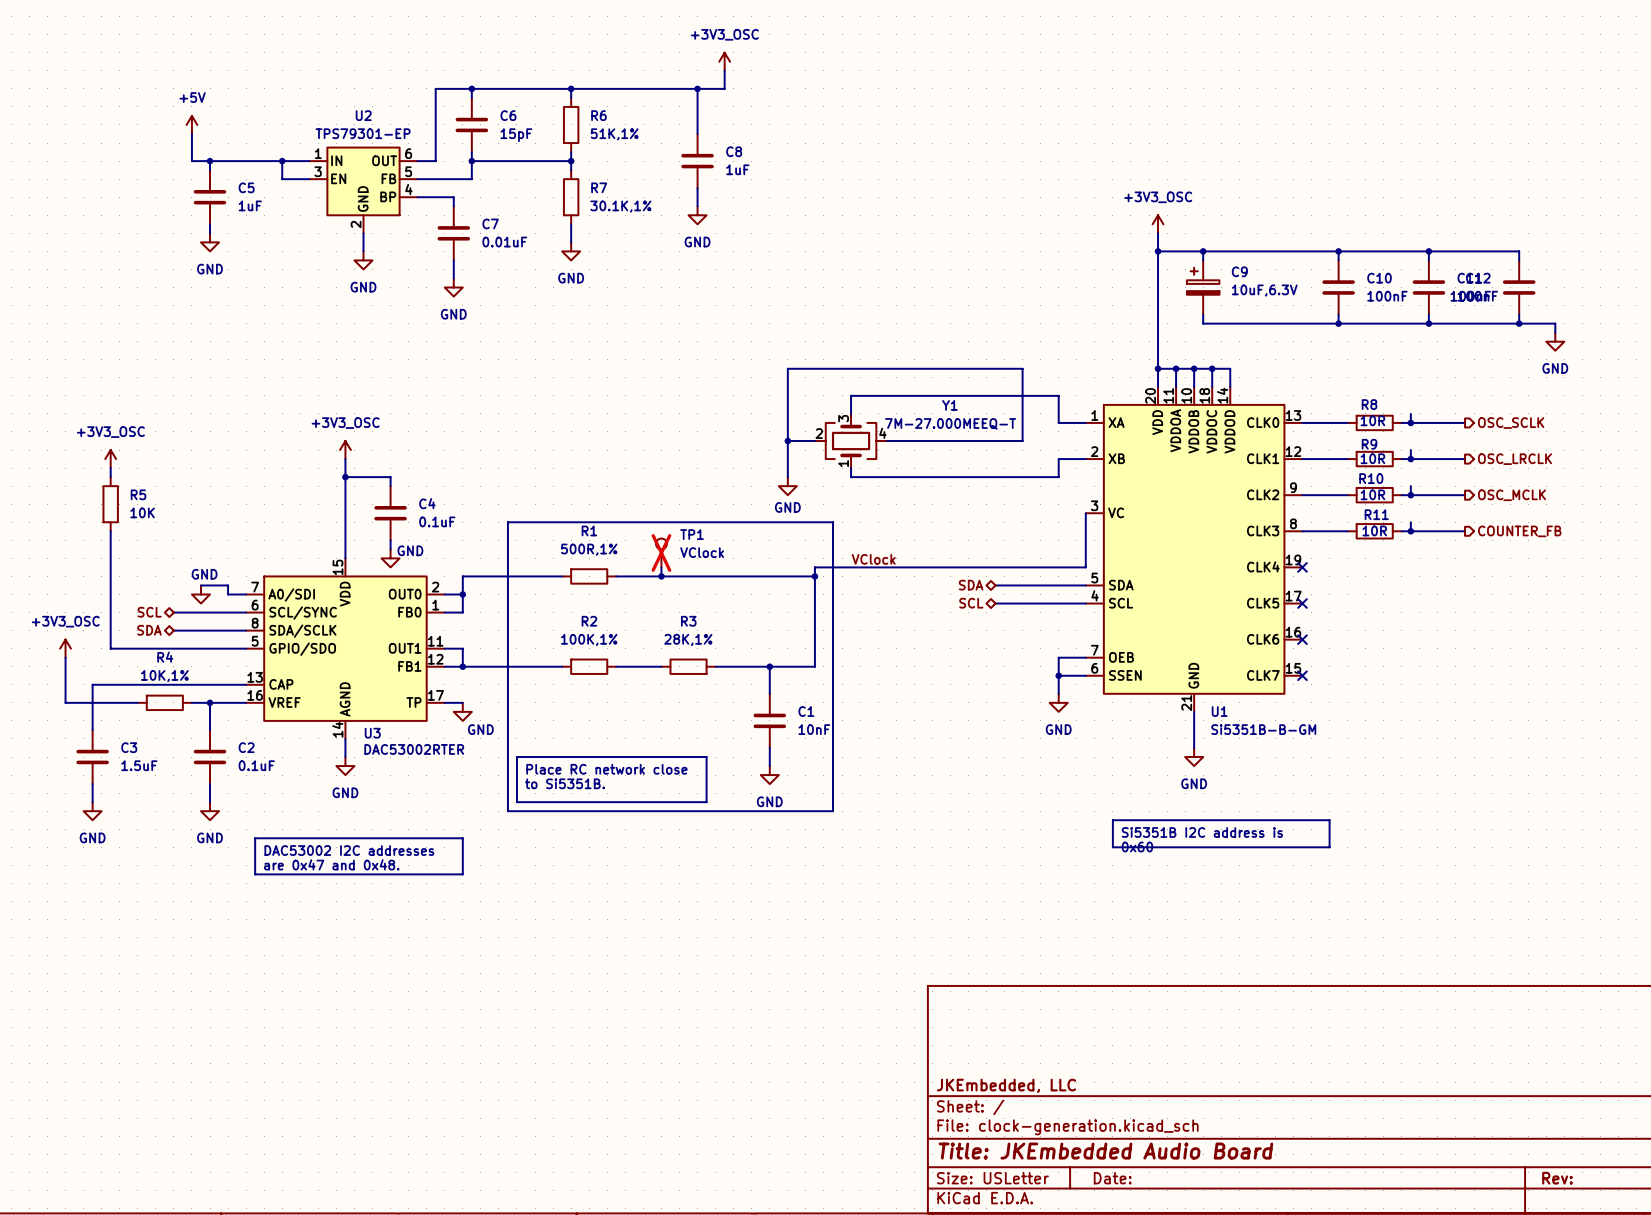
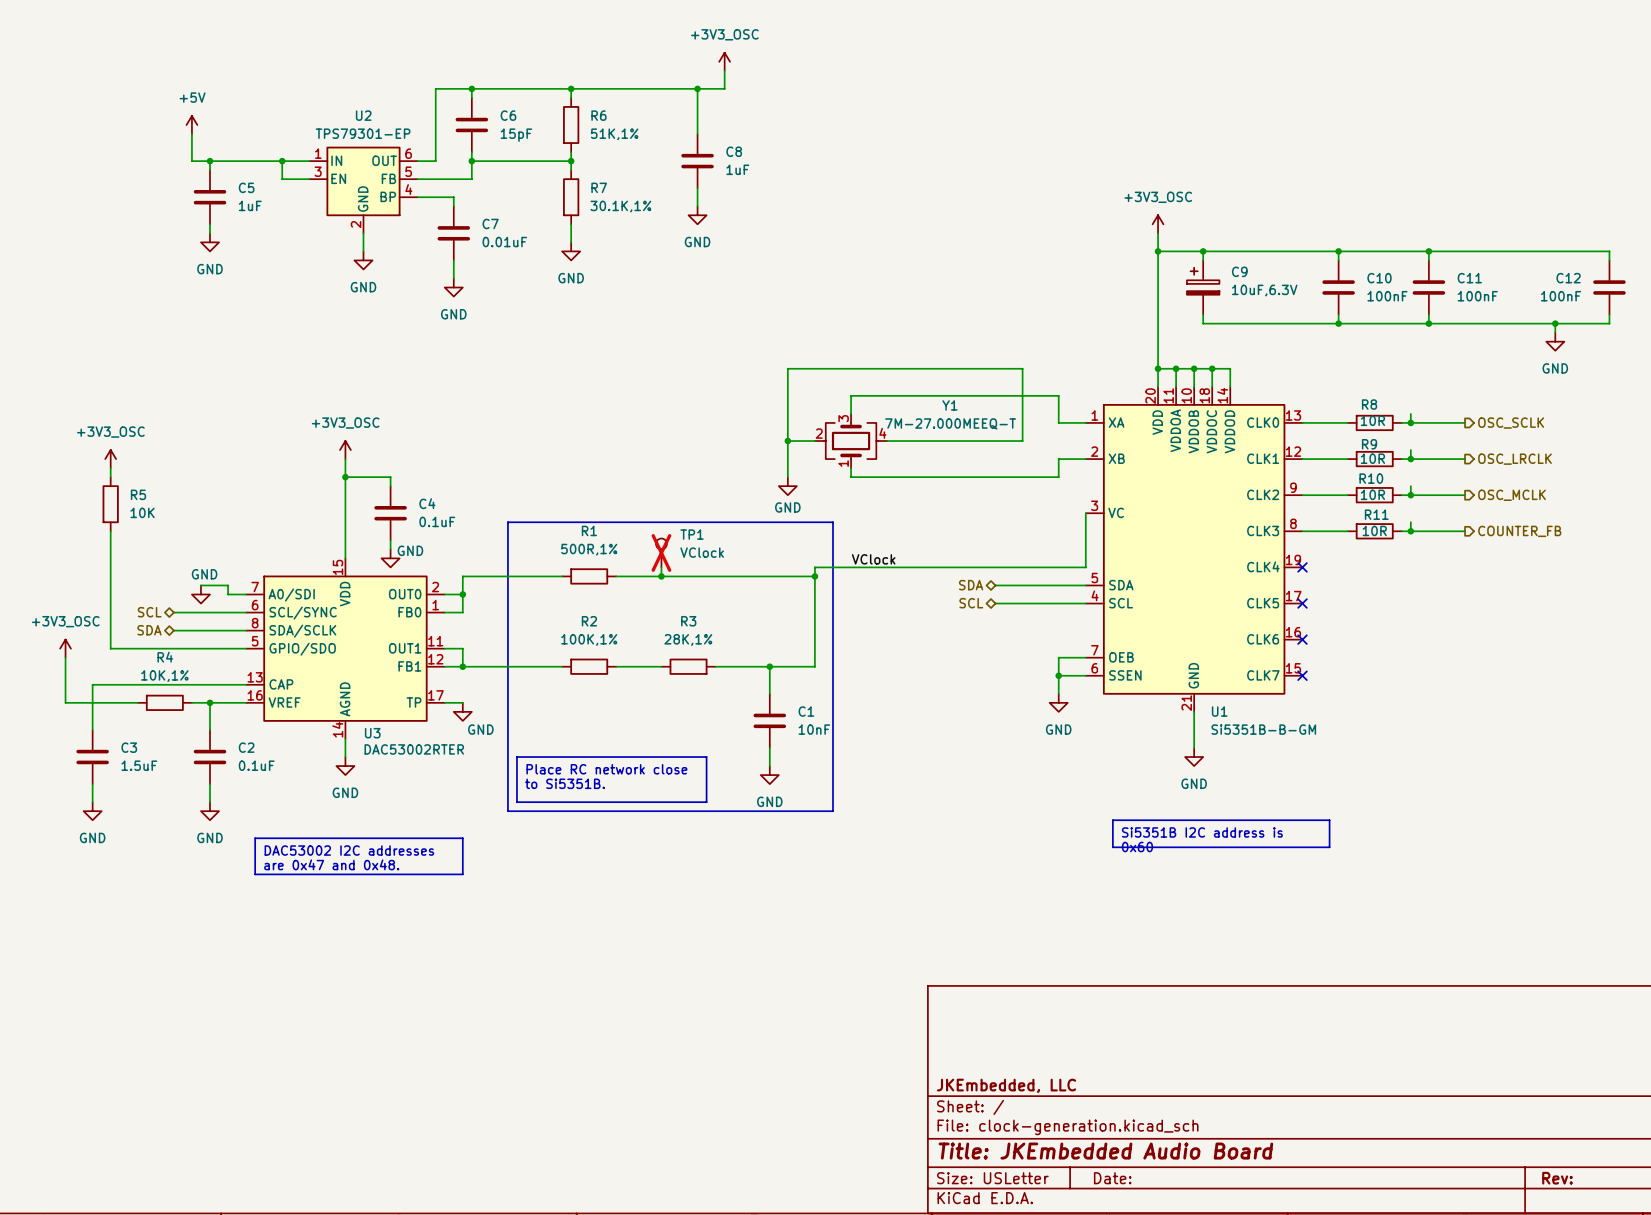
wire: (1519, 251) (1519, 260) -> (1519, 251) (1609, 251) (1609, 260)
C12 position: (1519, 287) -> (1609, 287)
wire: (1519, 314) (1519, 323) -> none
wire: none -> (1609, 314) (1609, 323) (1555, 323)
junction position: (1519, 323) -> (1555, 323)

